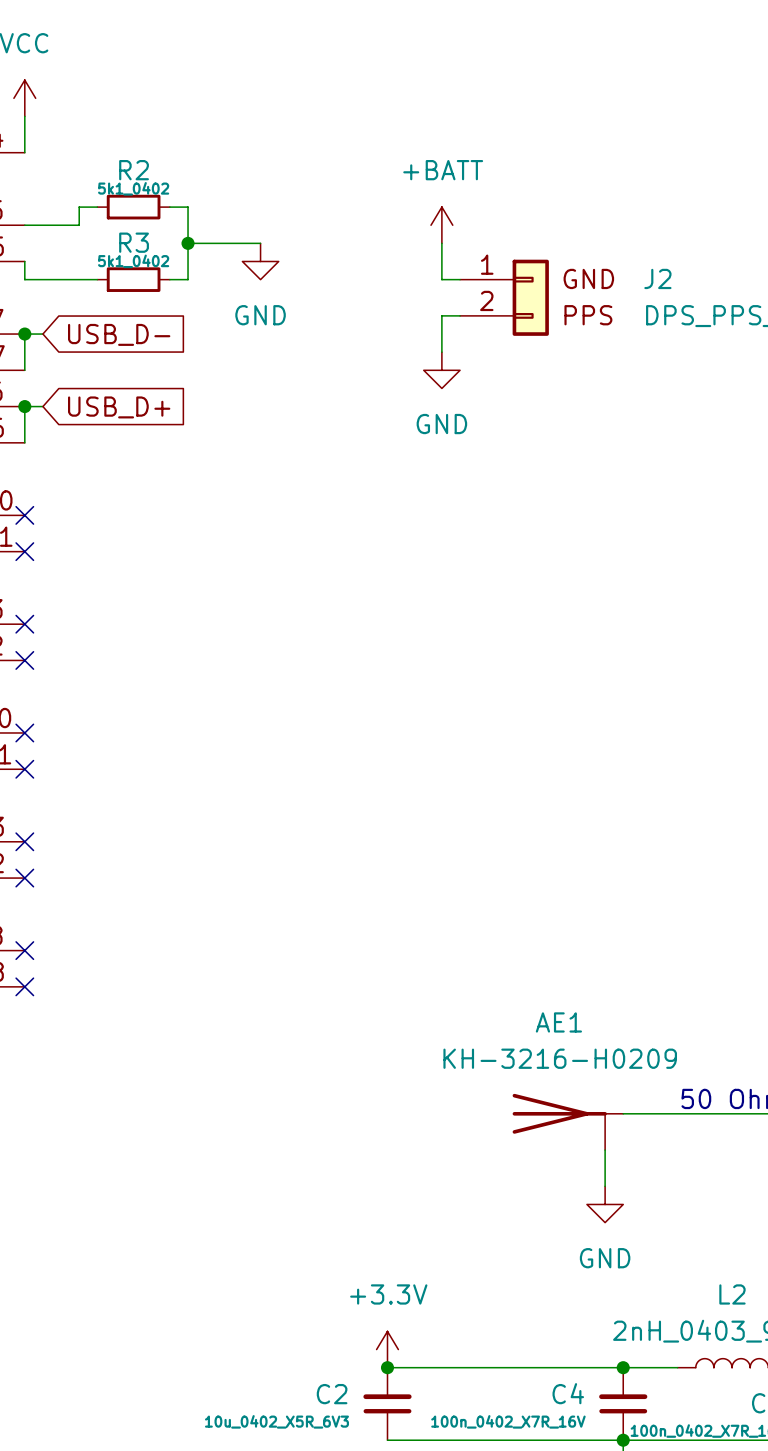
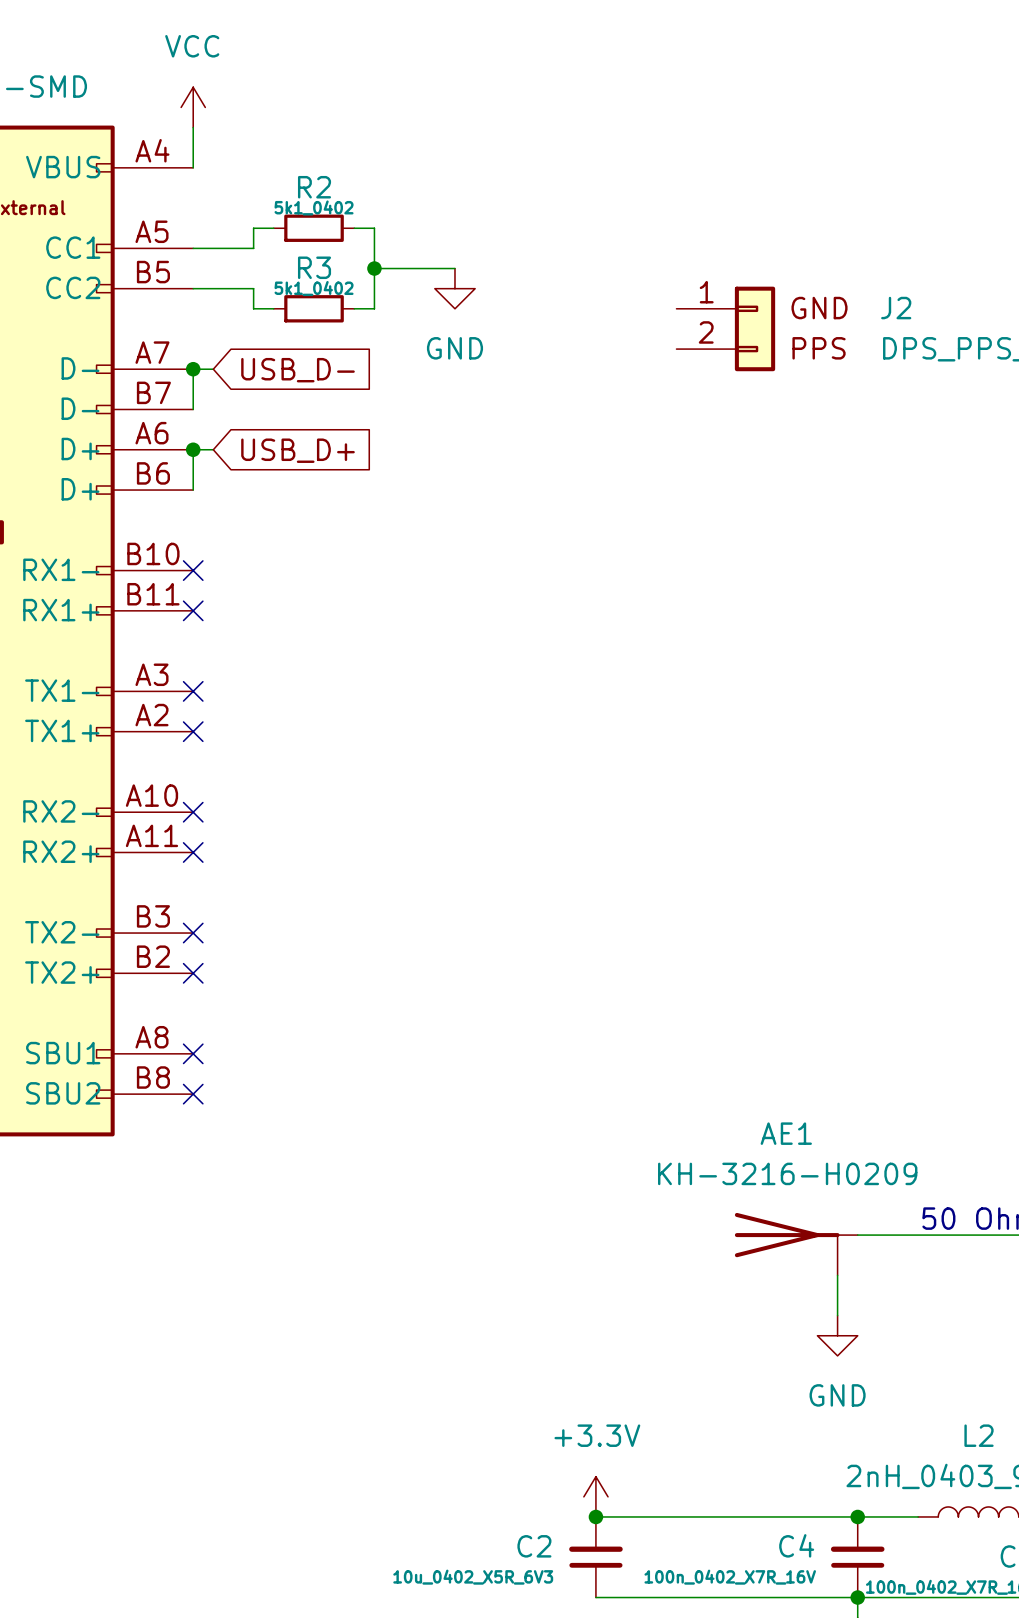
power symbol: +BATT (441, 225) -> none
wire: (441, 243) (441, 279) (460, 279) -> none
wire: (24, 261) (24, 279) (79, 279) -> (193, 288) (253, 288) (253, 308)
wire: (460, 315) (441, 315) (441, 352) -> none
power symbol: GND (441, 370) -> none

